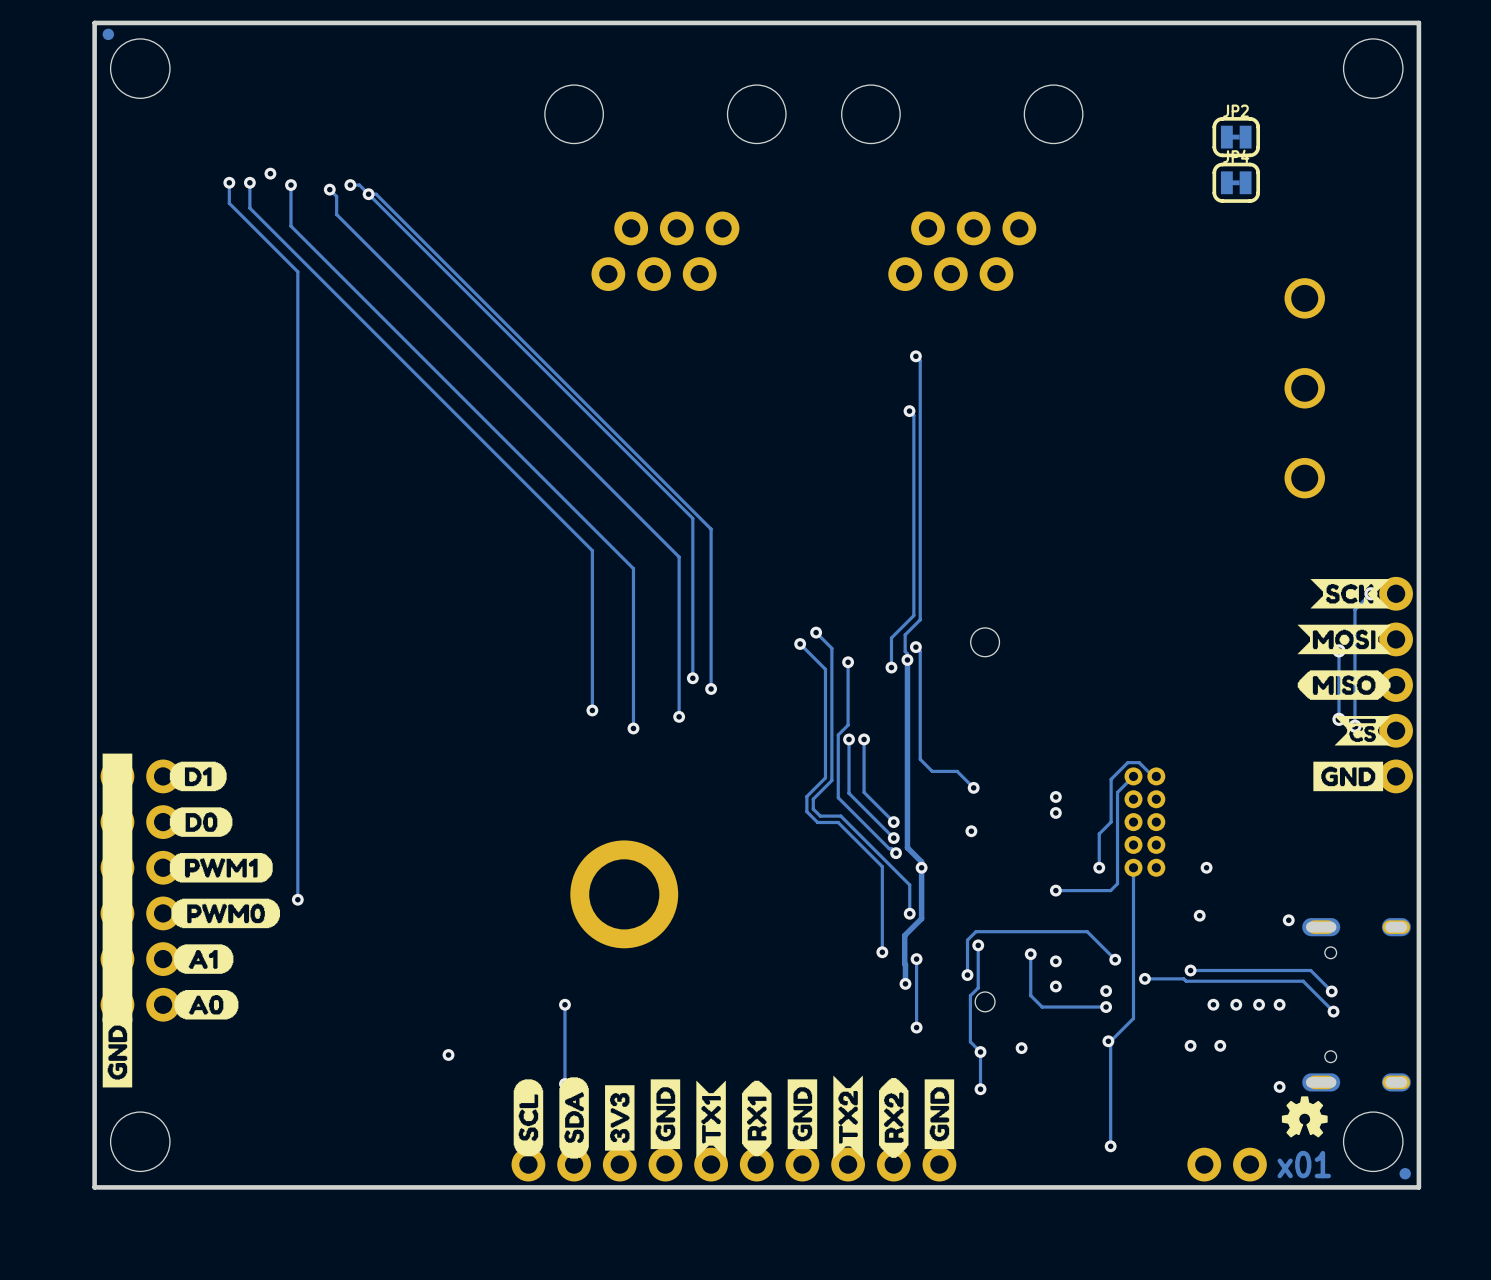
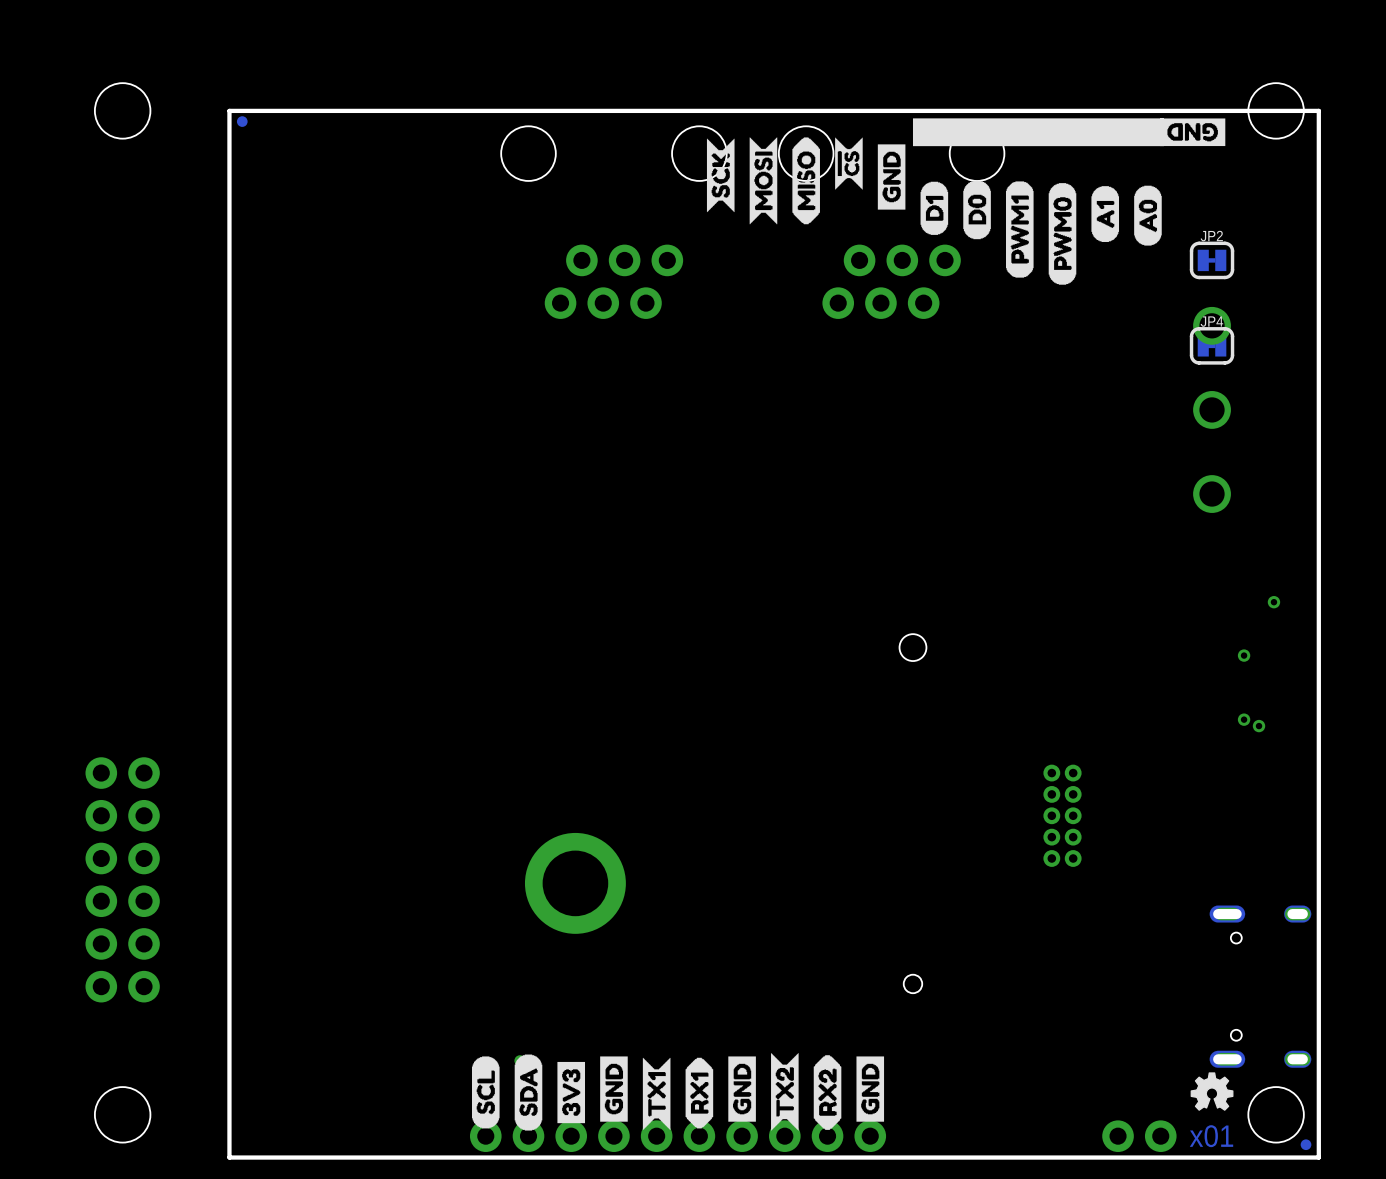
part position: (108, 34) -> (242, 121)
board edge: (1418, 68) (1418, 22) (94, 22) (94, 1187) (254, 1187) -> (1318, 110) (229, 110) (229, 1157)
drawing: none -> [706, 118, 1226, 285]
JP2 position: (1236, 137) -> (1212, 260)
via: (270, 173) -> none
track: (229, 182) (229, 203) (297, 271) (297, 899) -> none
via: (229, 182) -> none
track: (249, 182) (249, 208) (592, 550) (592, 710) -> none
via: (249, 182) -> none
JP4 position: (1236, 182) -> (1212, 345)
track: (290, 185) (290, 226) (633, 568) (633, 728) -> none
via: (290, 185) -> none
track: (350, 185) (359, 185) (692, 518) (692, 678) -> none
via: (350, 185) -> none
track: (329, 189) (336, 196) (336, 214) (679, 557) (679, 716) -> none
via: (329, 189) -> none
track: (368, 194) (376, 194) (711, 529) (711, 689) -> none
via: (368, 194) -> none
track: (915, 356) (920, 360) (920, 619) (905, 634) (905, 651) (907, 653) (907, 847) (921, 861) (921, 918) (904, 935) (905, 983) -> none
via: (915, 356) -> none
track: (909, 411) (913, 415) (913, 615) (891, 637) (891, 667) -> none
via: (909, 411) -> none
drawing: [1297, 579, 1391, 792] -> none
track: (1370, 593) (1354, 609) (1354, 726) -> none
track: (816, 632) (831, 648) (831, 780) (813, 799) (813, 809) (820, 816) (840, 816) (909, 884) (909, 913) -> none
via: (816, 632) -> none
track: (800, 644) (825, 669) (825, 777) (806, 796) (806, 811) (817, 822) (838, 822) (882, 866) (882, 952) -> none
via: (800, 644) -> none
track: (915, 647) (920, 651) (920, 759) (932, 771) (957, 771) (973, 787) -> none
via: (915, 647) -> none
track: (1338, 650) (1338, 719) -> none
via: (907, 659) -> none
track: (848, 662) (848, 725) (838, 735) (838, 797) (889, 848) (896, 853) -> none
via: (848, 662) -> none
via: (891, 667) -> none
via: (692, 678) -> none
part: (1396, 685) -> none
via: (711, 689) -> none
via: (592, 710) -> none
via: (679, 716) -> none
via: (633, 728) -> none
track: (849, 739) (849, 793) (893, 838) -> none
via: (849, 739) -> none
track: (864, 739) (864, 792) (893, 822) -> none
via: (864, 739) -> none
drawing: [102, 753, 133, 1088] -> none
drawing: [169, 761, 280, 1020] -> none
track: (1133, 776) (1117, 792) (1117, 883) (1110, 890) (1055, 890) -> none
track: (1156, 776) (1152, 776) (1139, 762) (1127, 762) (1111, 779) (1111, 822) (1099, 833) (1099, 867) -> none
via: (973, 787) -> none
via: (1055, 796) -> none
via: (1055, 812) -> none
via: (893, 822) -> none
via: (971, 831) -> none
via: (893, 838) -> none
via: (896, 853) -> none
via: (921, 867) -> none
via: (1099, 867) -> none
track: (1133, 867) (1133, 1018) (1110, 1041) (1108, 1041) (1110, 1043) (1110, 1146) -> none
via: (1206, 867) -> none
via: (1055, 890) -> none
via: (297, 899) -> none
via: (909, 913) -> none
via: (1199, 915) -> none
via: (1288, 920) -> none
track: (978, 945) (978, 987) (970, 995) (970, 1041) (980, 1052) (980, 1089) -> none
via: (978, 945) -> none
via: (882, 952) -> none
track: (1030, 954) (1030, 995) (1042, 1007) (1106, 1006) -> none
via: (1030, 954) -> none
track: (916, 959) (916, 1027) -> none
via: (916, 959) -> none
track: (1115, 959) (1087, 931) (975, 931) (967, 940) (967, 975) -> none
via: (1115, 959) -> none
via: (1055, 961) -> none
track: (1190, 970) (1310, 970) (1331, 991) -> none
via: (1190, 970) -> none
via: (967, 975) -> none
track: (1144, 978) (1183, 978) (1186, 981) (1303, 981) (1333, 1011) -> none
via: (1144, 978) -> none
via: (905, 983) -> none
via: (1055, 986) -> none
via: (1106, 991) -> none
via: (1331, 991) -> none
track: (564, 1004) (564, 1083) -> none
via: (564, 1004) -> none
via: (1213, 1004) -> none
via: (1236, 1004) -> none
via: (1259, 1004) -> none
via: (1279, 1004) -> none
via: (1106, 1007) -> none
via: (1333, 1011) -> none
via: (916, 1027) -> none
via: (1108, 1041) -> none
via: (1190, 1045) -> none
via: (1220, 1045) -> none
via: (1021, 1048) -> none
via: (980, 1052) -> none
via: (448, 1054) -> none
via: (1279, 1086) -> none
via: (980, 1089) -> none
via: (1110, 1146) -> none

